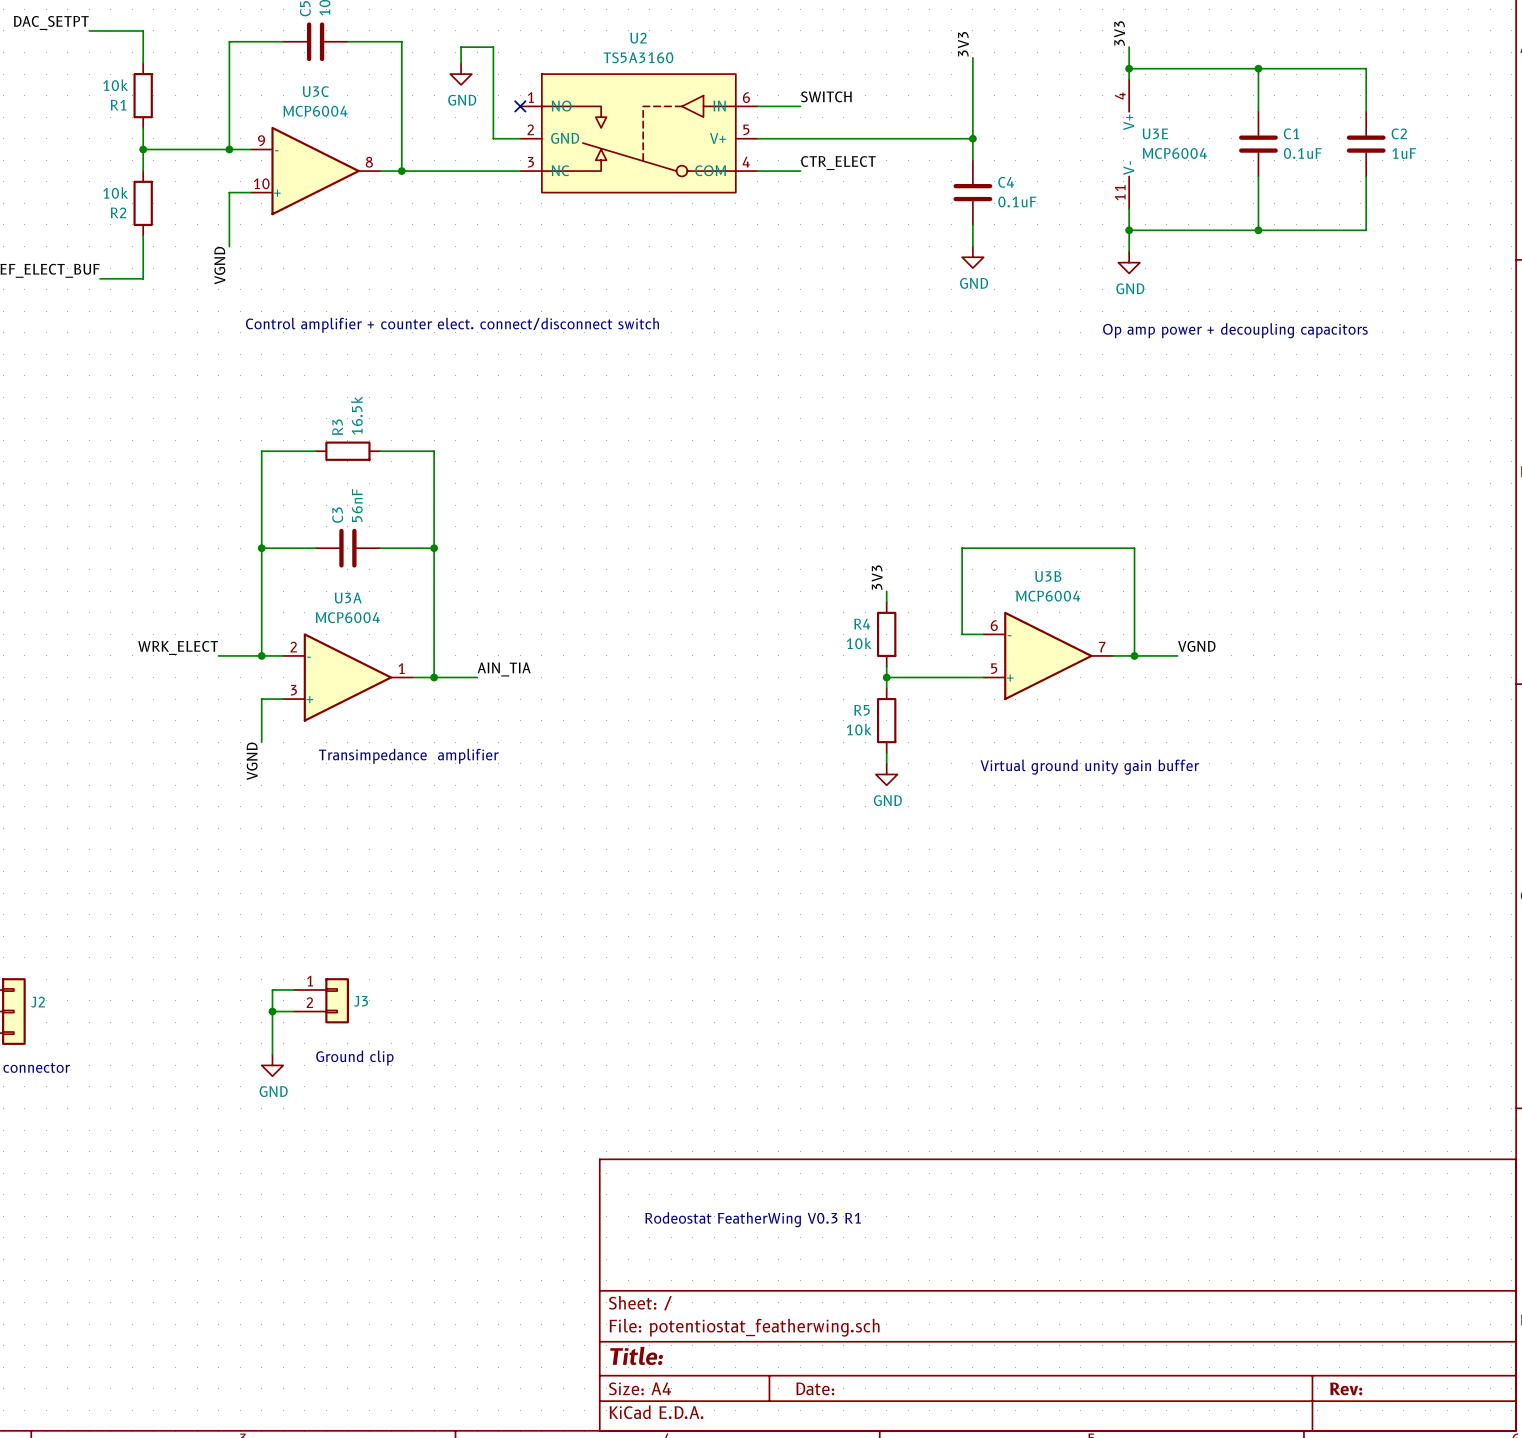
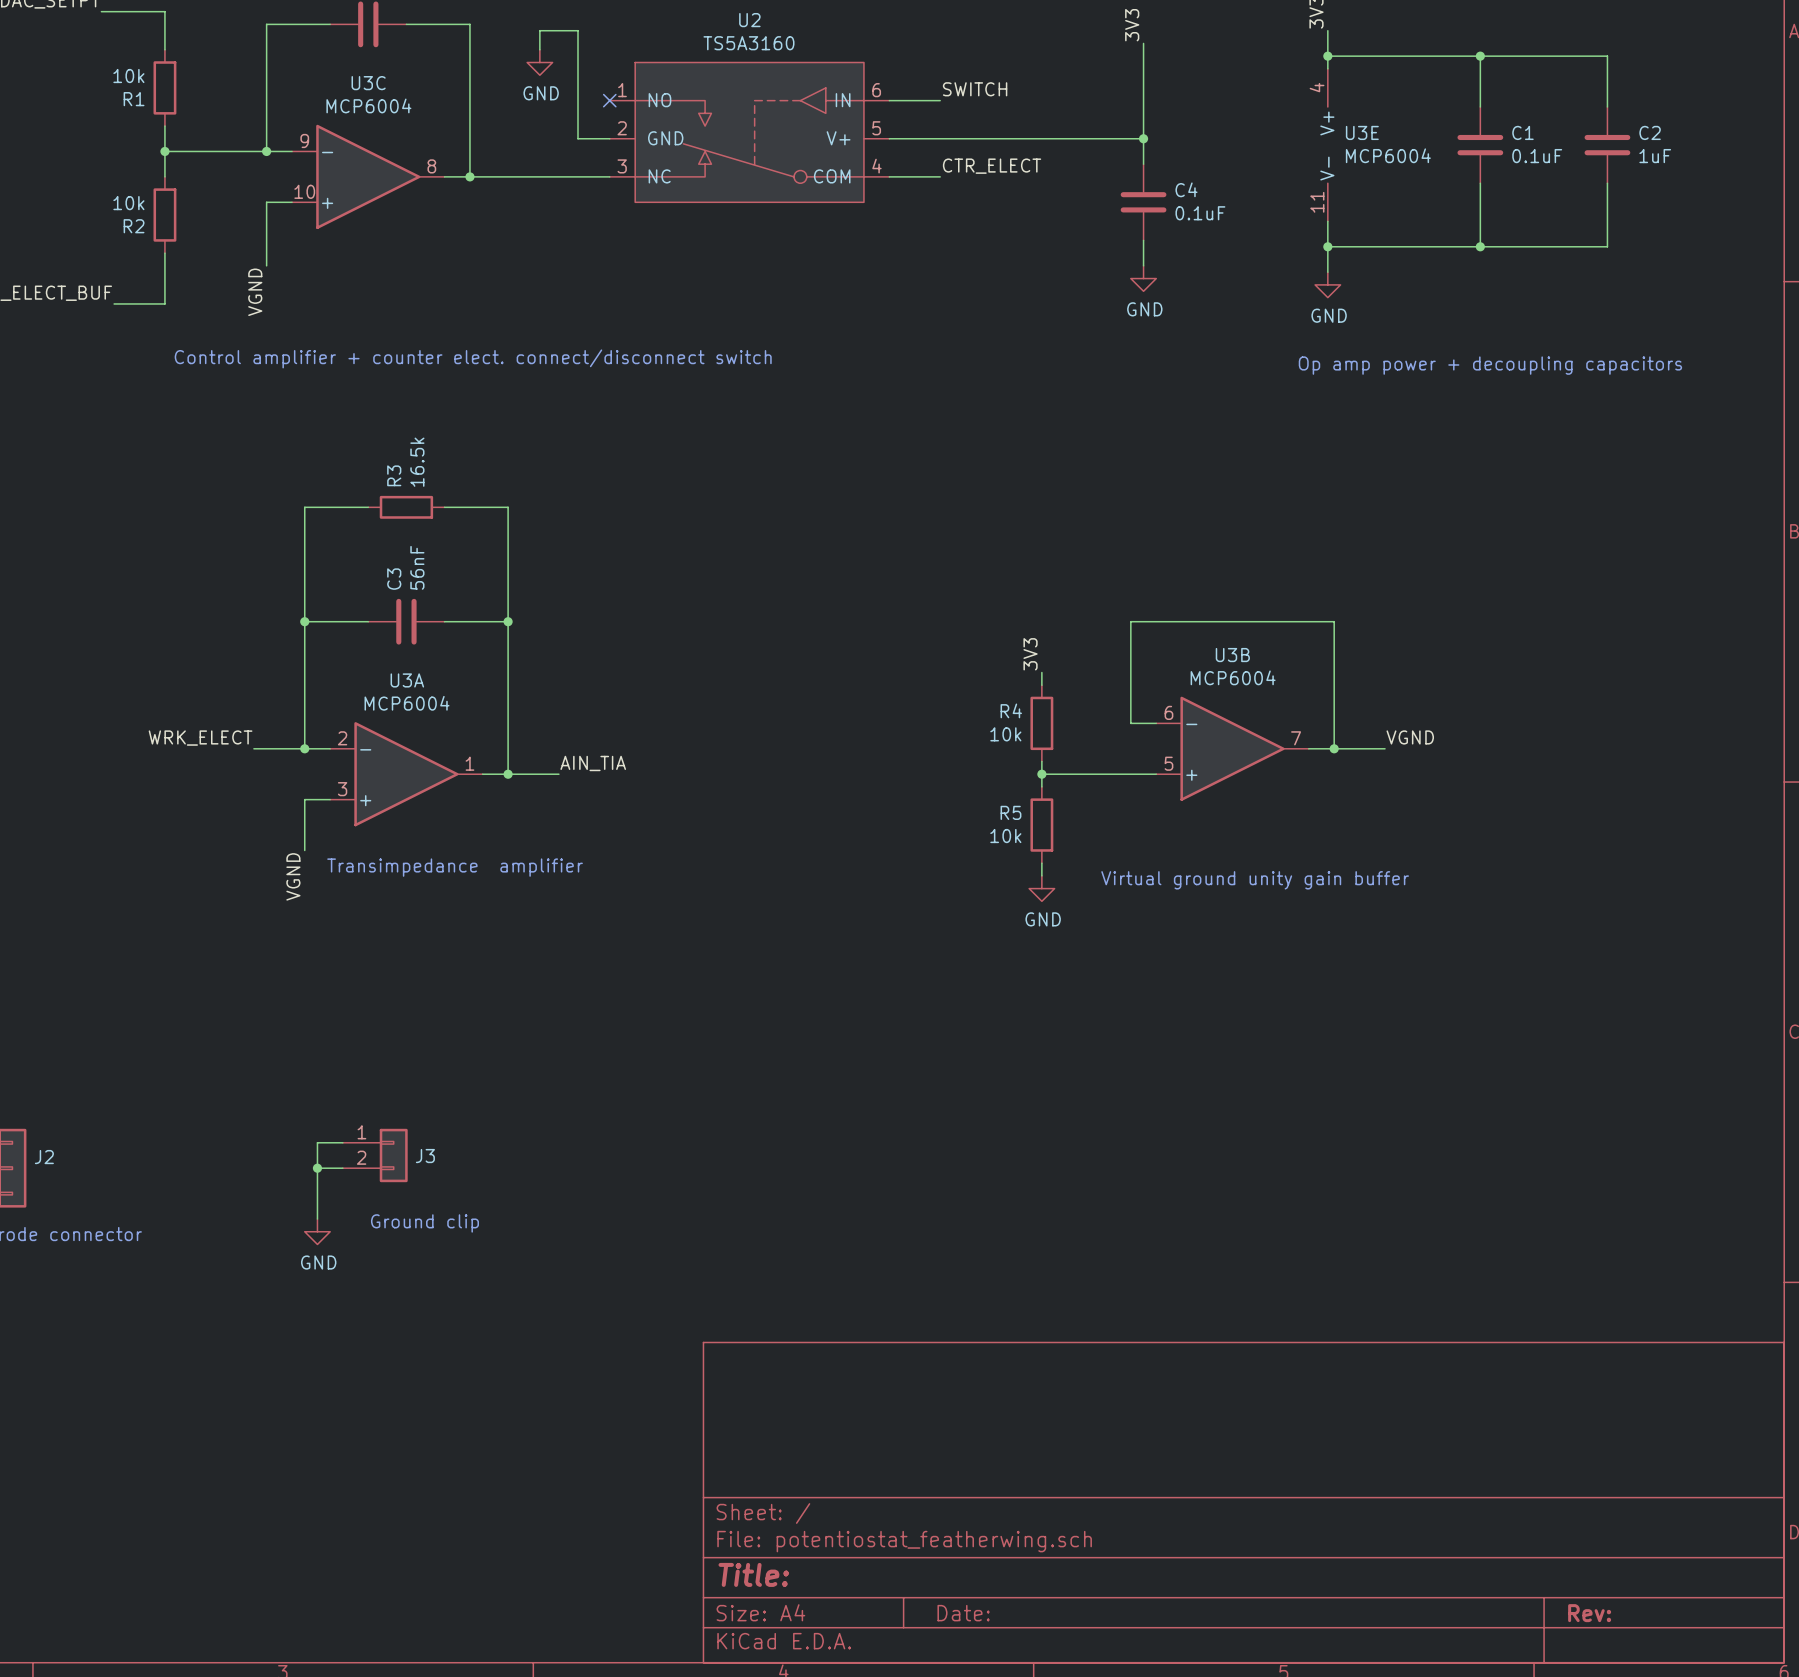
text: Rodeostat FeatherWing V0.3 R1 (753, 1219) -> none

